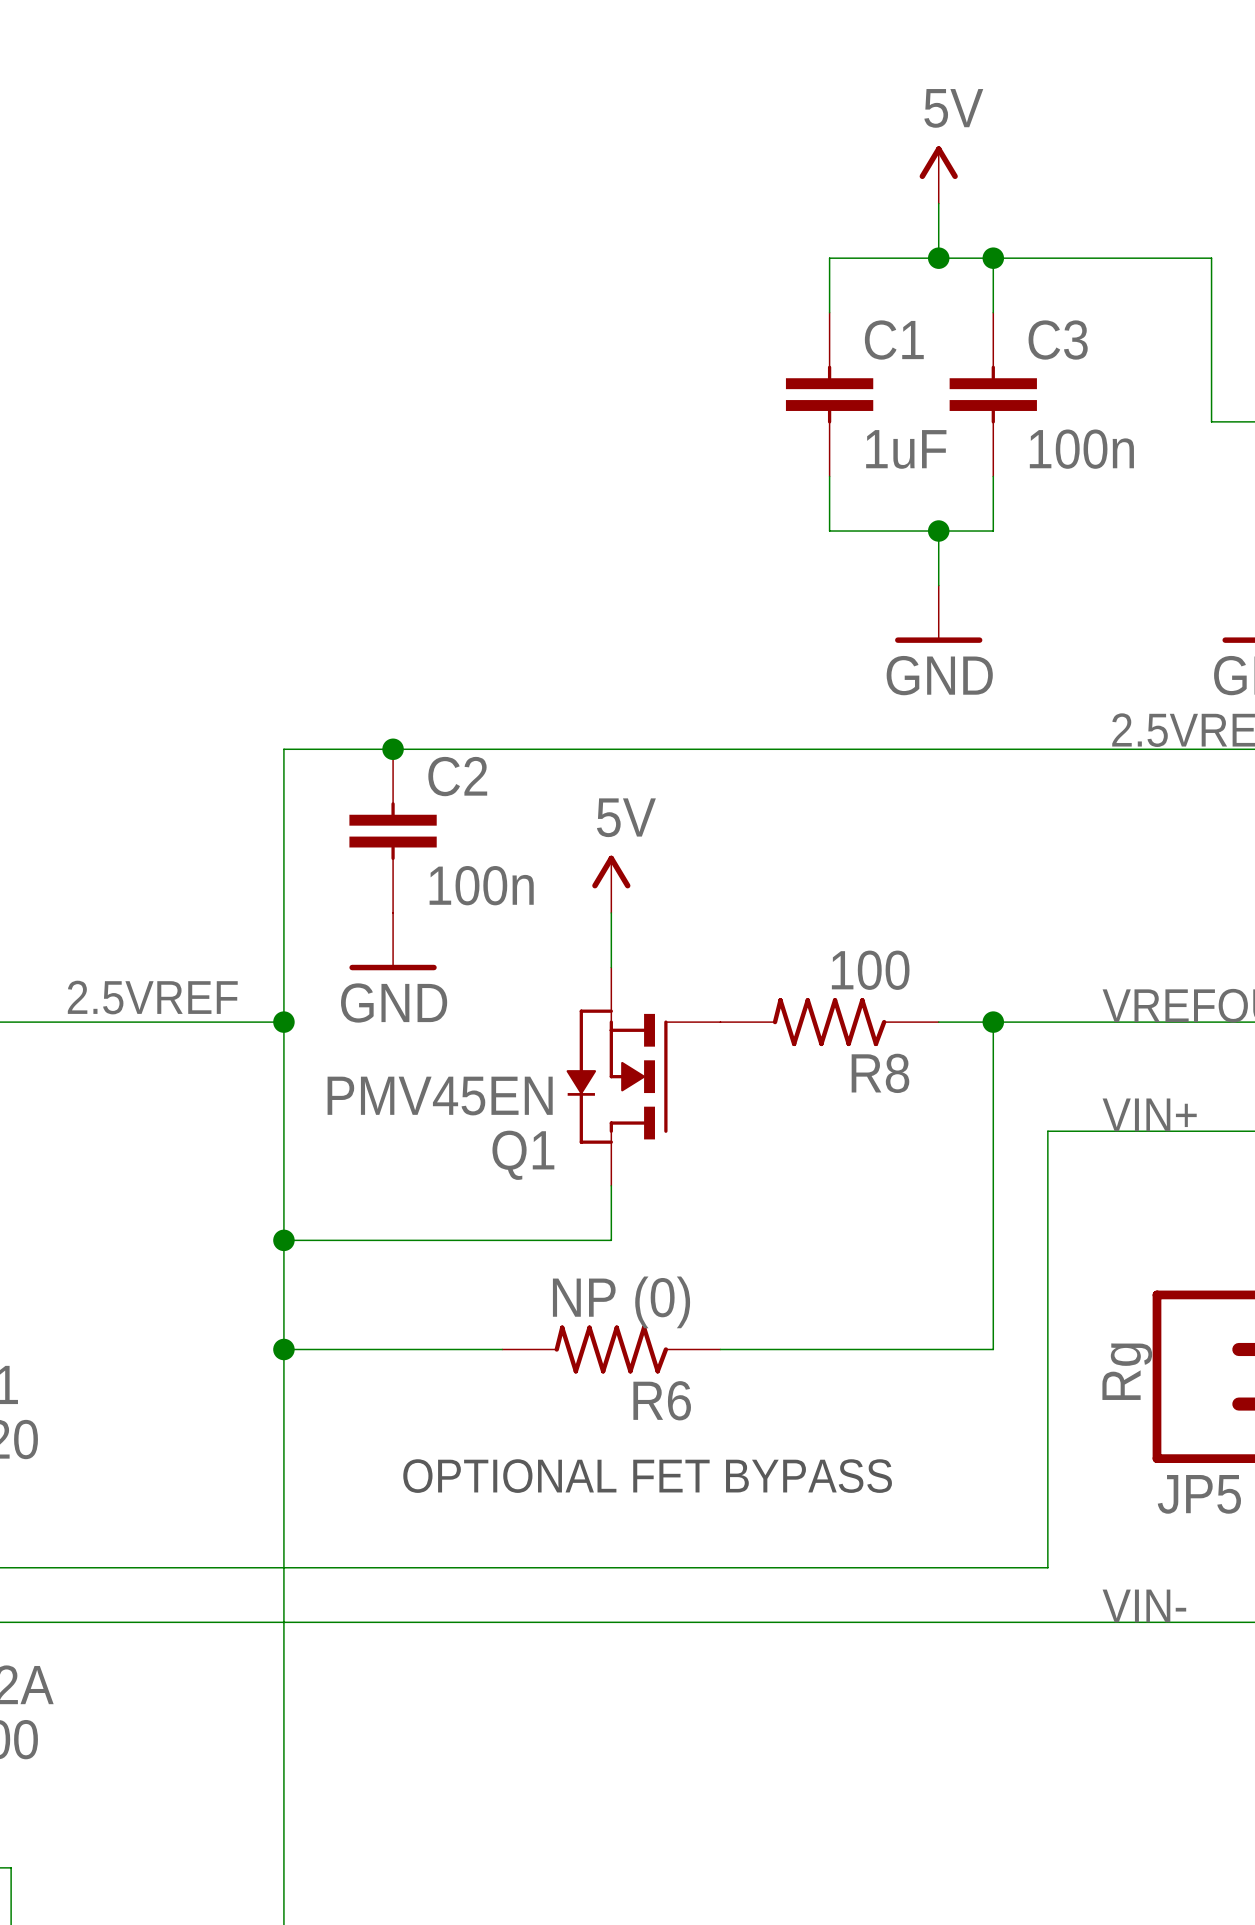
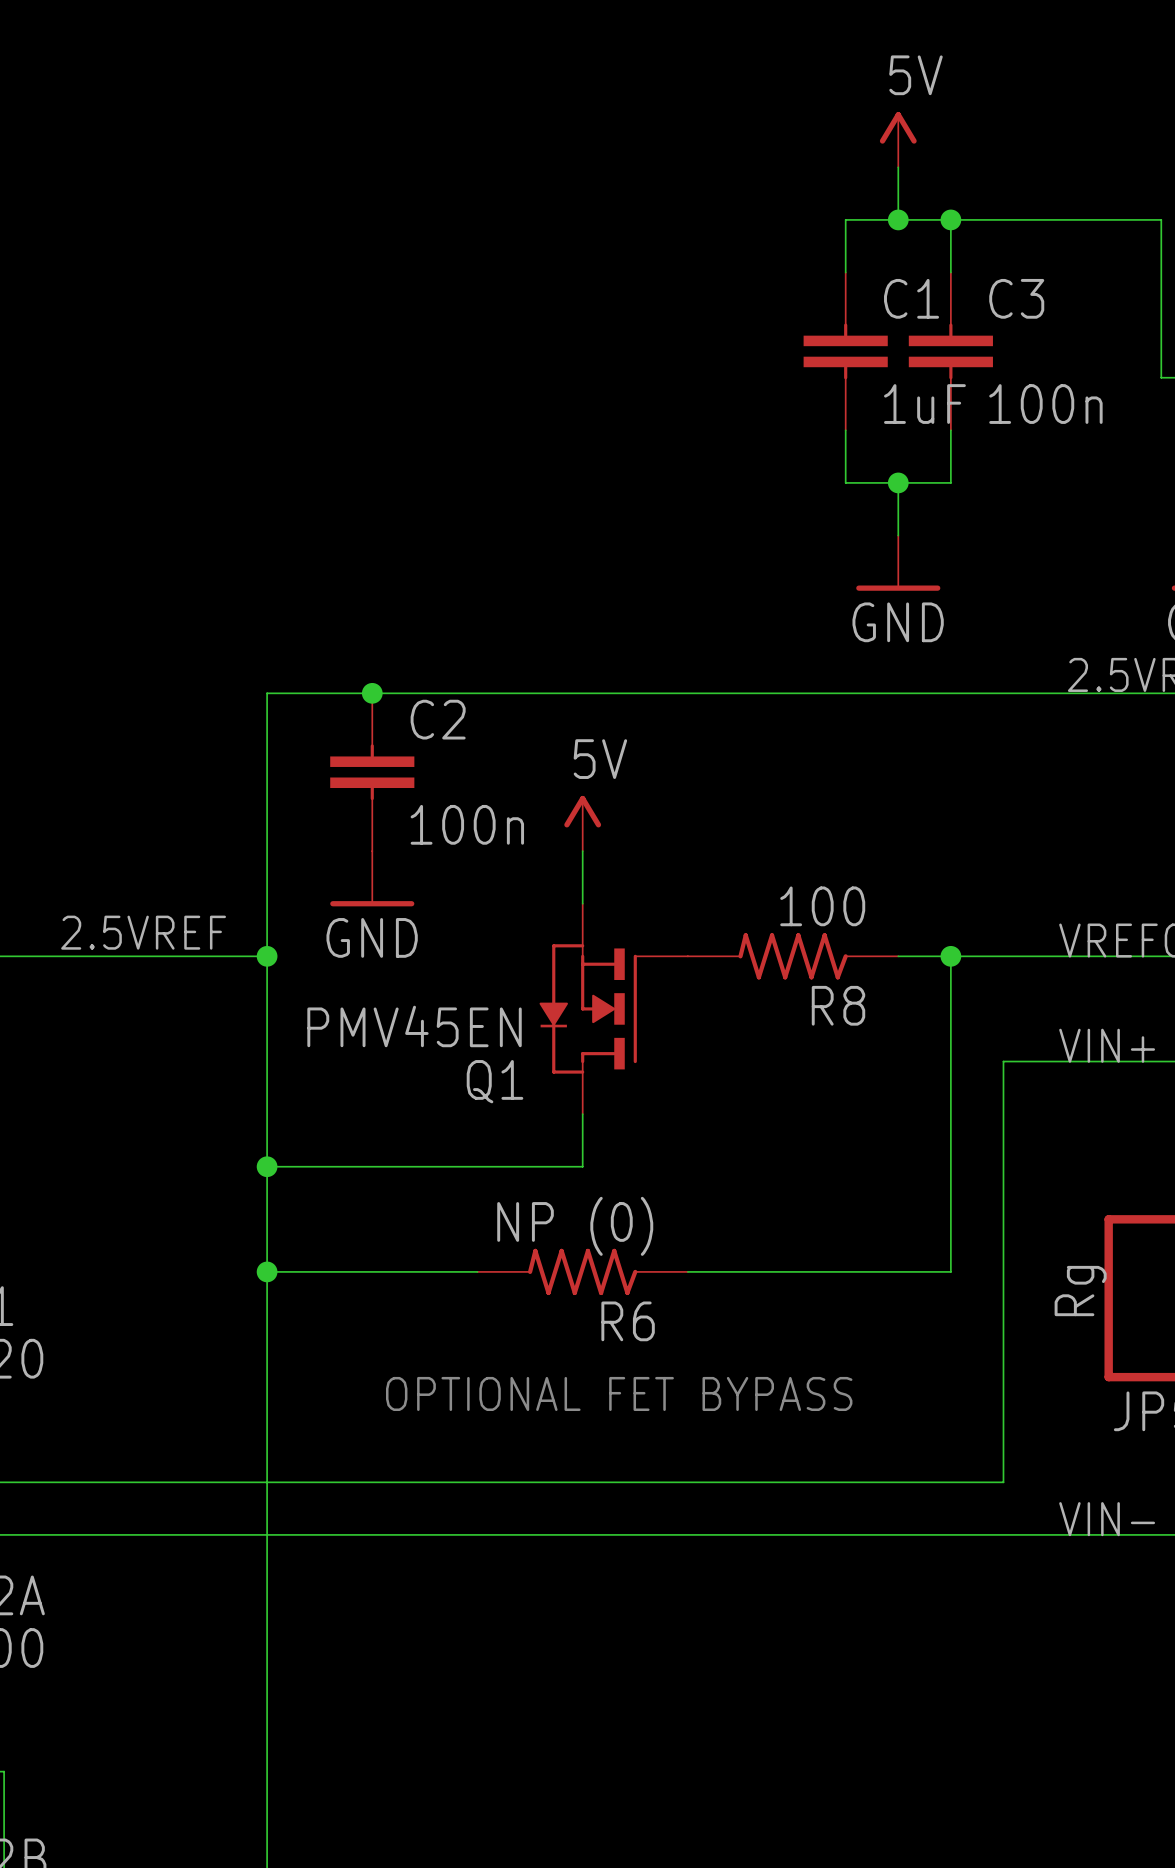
wire: (884, 258) (829, 258) (829, 312) -> (845, 219) (845, 272)
C1 position: (829, 394) -> (845, 351)
wire: (829, 476) (829, 531) (884, 531) -> (845, 430) (845, 482)

